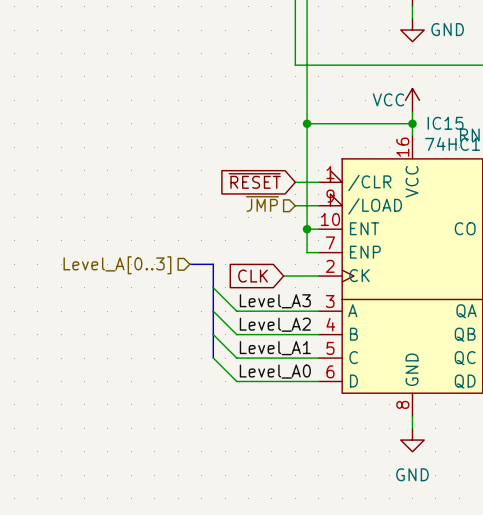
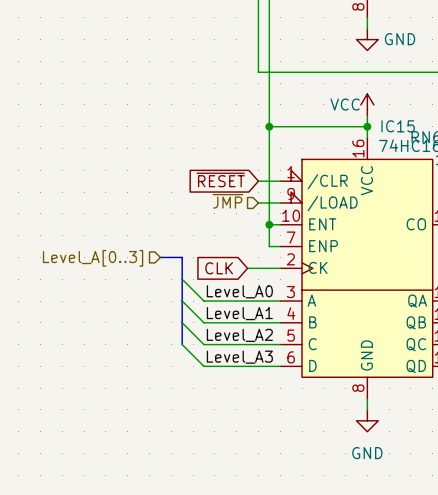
label: Level_A3 (275, 301) -> Level_A0 (239, 291)
label: Level_A2 (275, 324) -> Level_A1 (239, 313)
label: Level_A1 (275, 348) -> Level_A2 (239, 335)
label: Level_A0 (275, 371) -> Level_A3 (239, 357)

